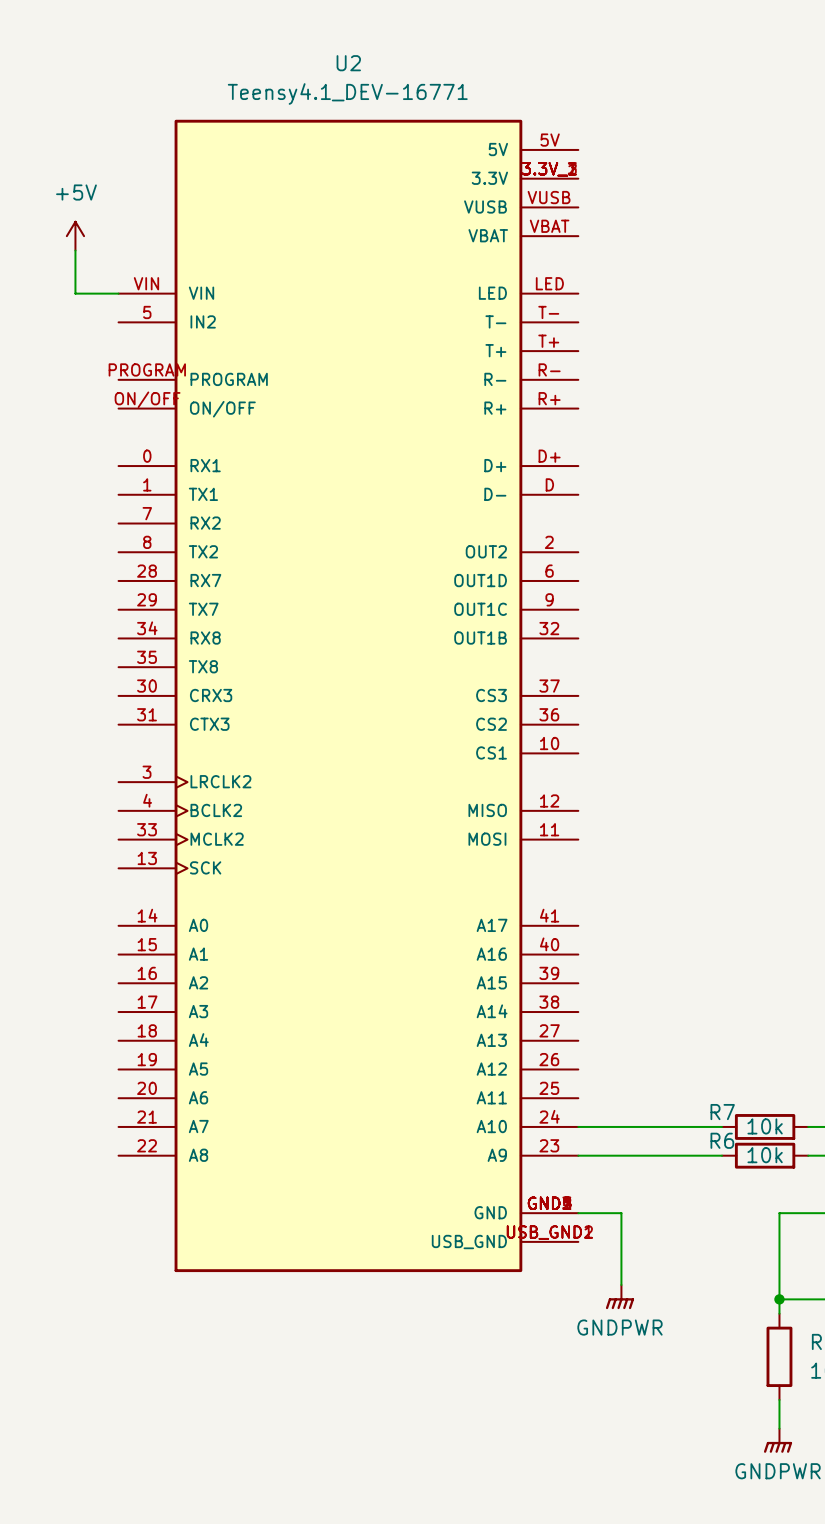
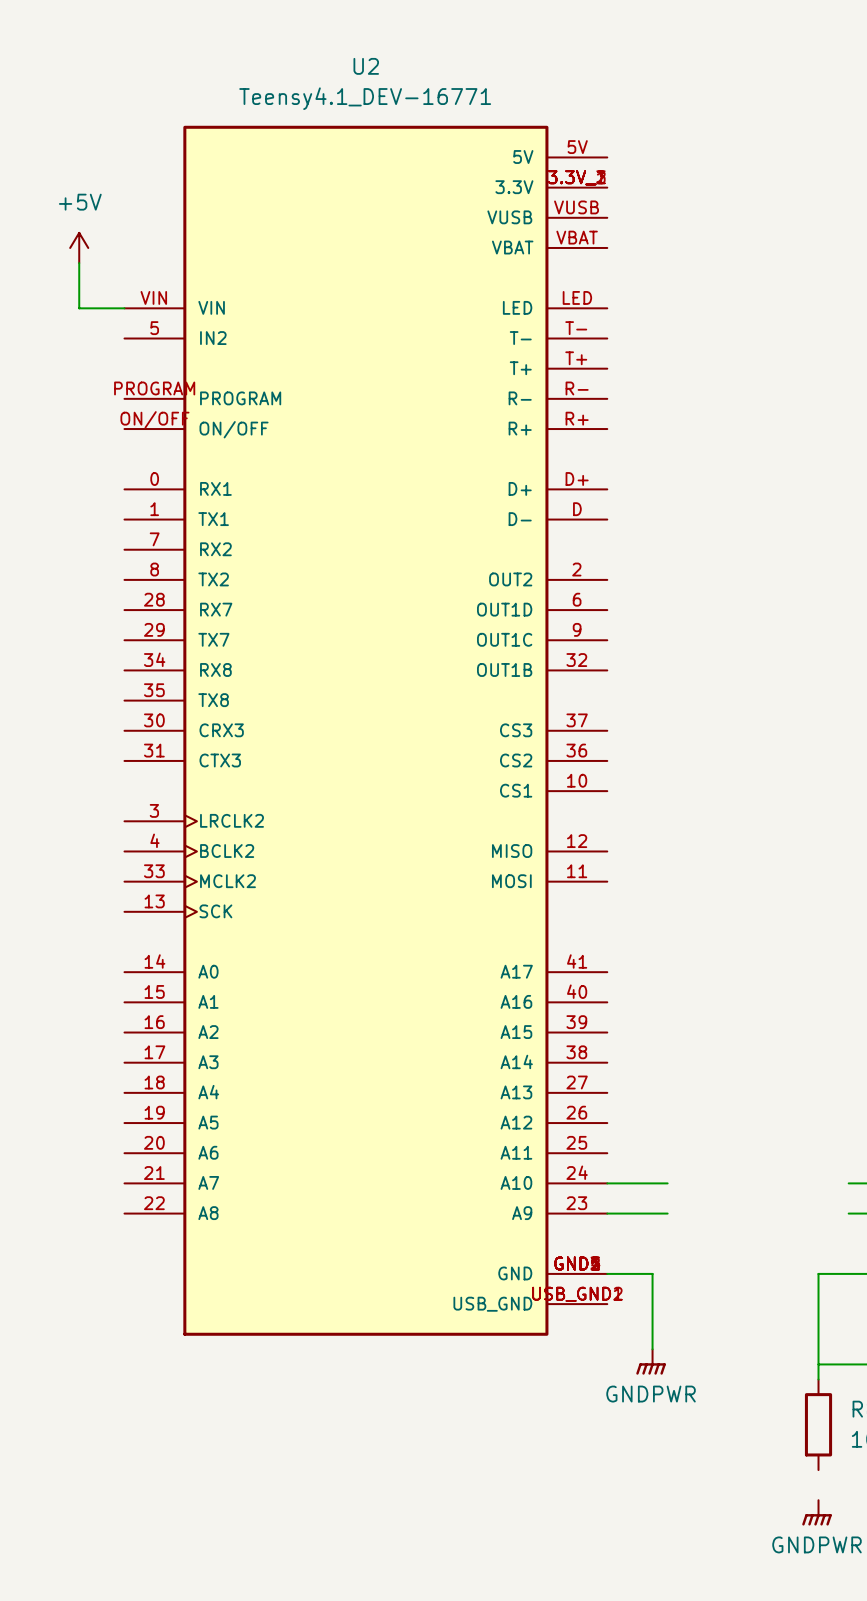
wire: (635, 1126) (722, 1126) -> none
R7: 10k (765, 1126) -> none
wire: (635, 1155) (722, 1155) -> none
R6: 10k (765, 1155) -> none
junction: (779, 1299) -> none
wire: (779, 1399) (779, 1428) -> none

